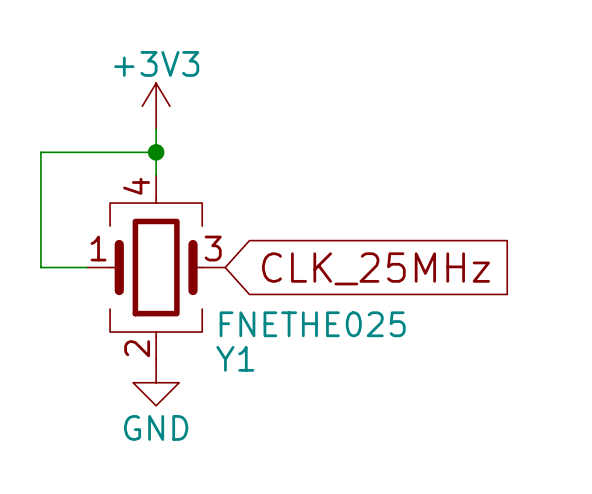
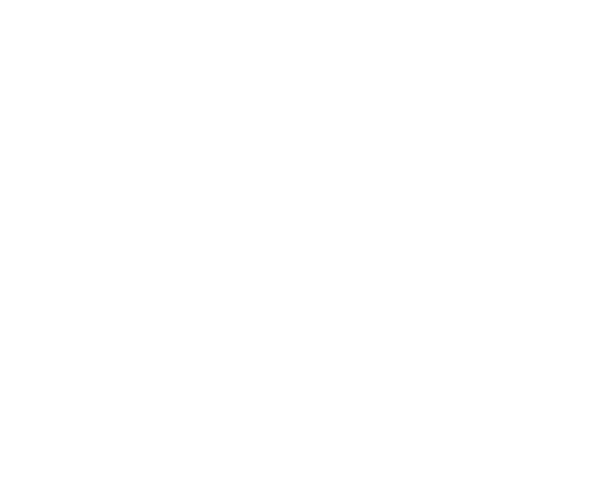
power symbol: +3V3 (156, 106) -> none
wire: (156, 129) (156, 175) -> none
wire: (156, 152) (40, 152) (40, 267) (87, 267) -> none
junction: (156, 152) -> none
Y1: FNETHE025 (156, 267) -> none
global label: CLK_25MHz (376, 268) -> none
power symbol: GND (156, 382) -> none

